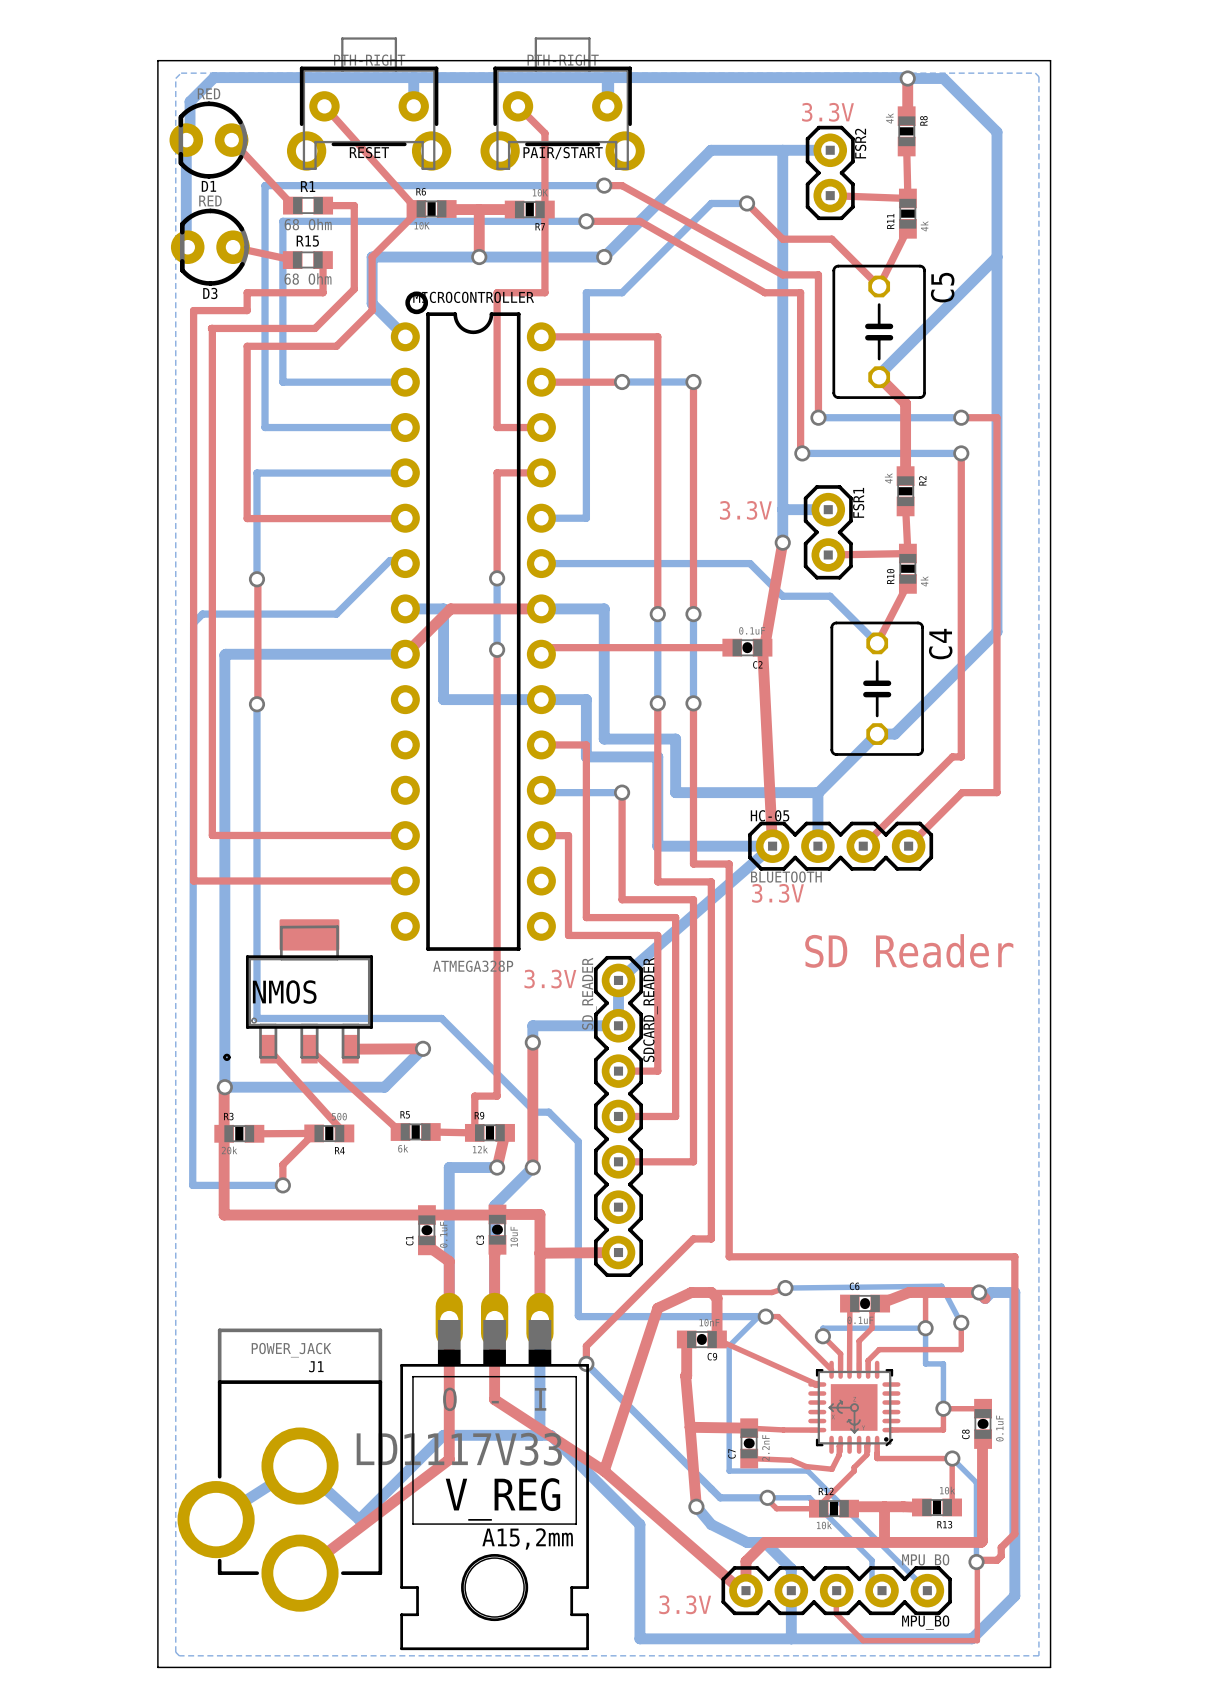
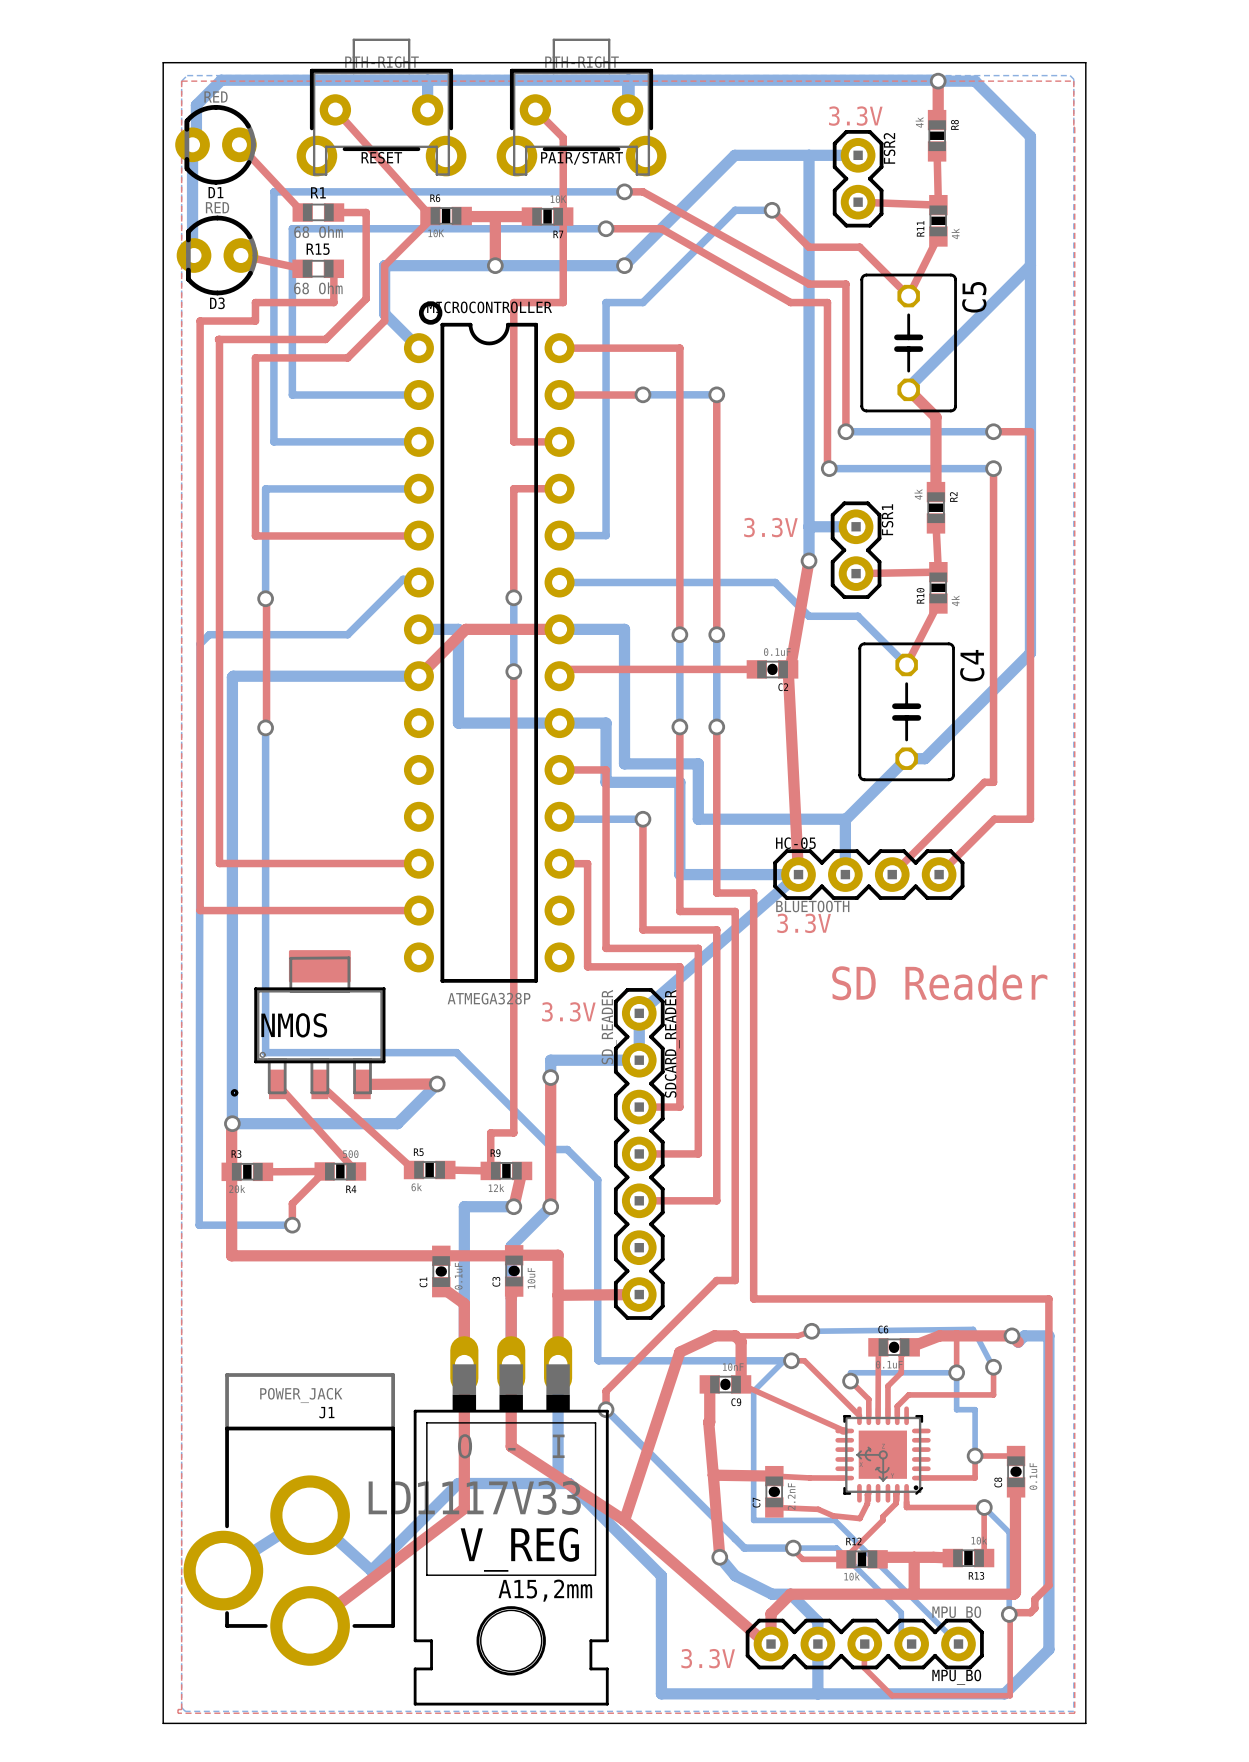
top zone outline: none -> (181, 81) (1073, 81) (1074, 1713) (177, 1713) (177, 1709) (181, 1709) (181, 81)

